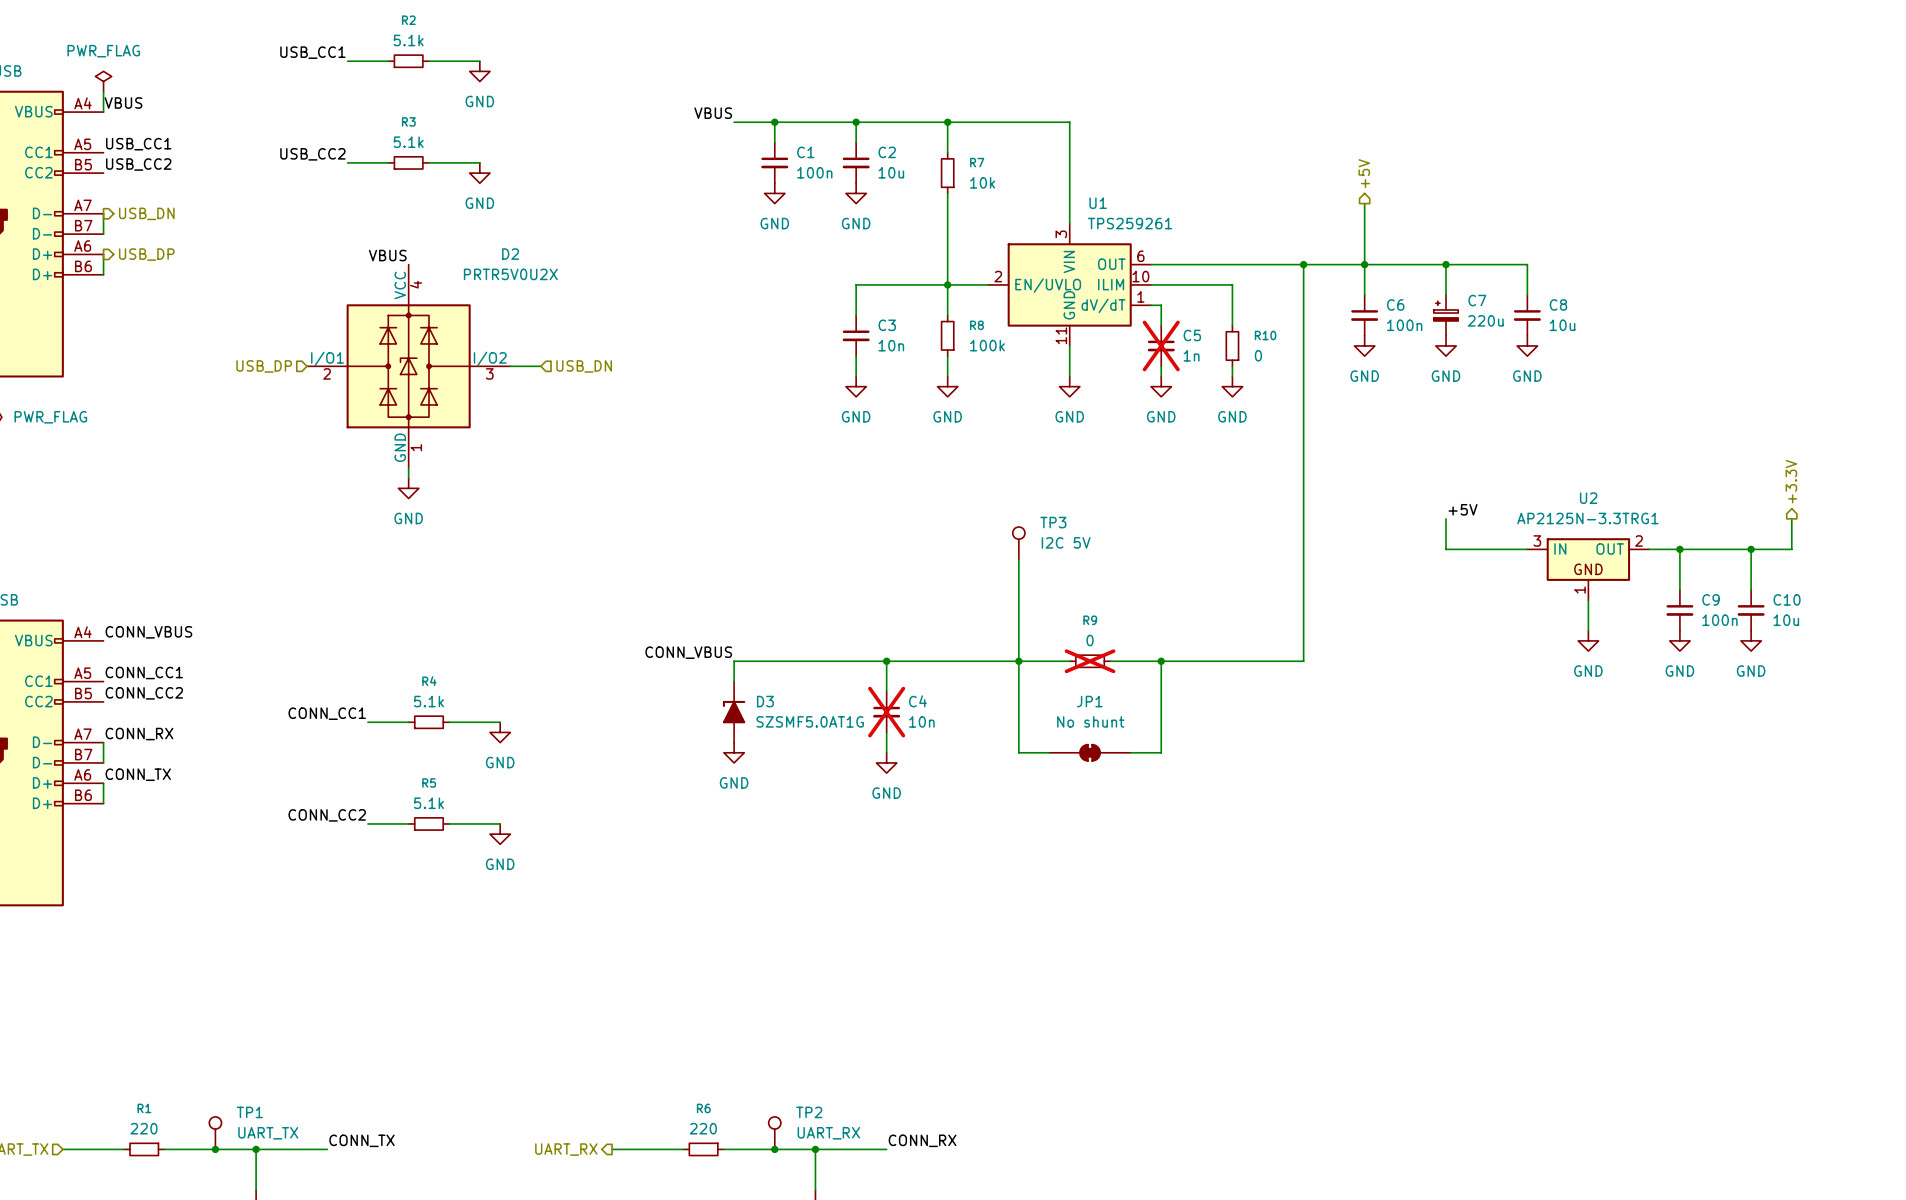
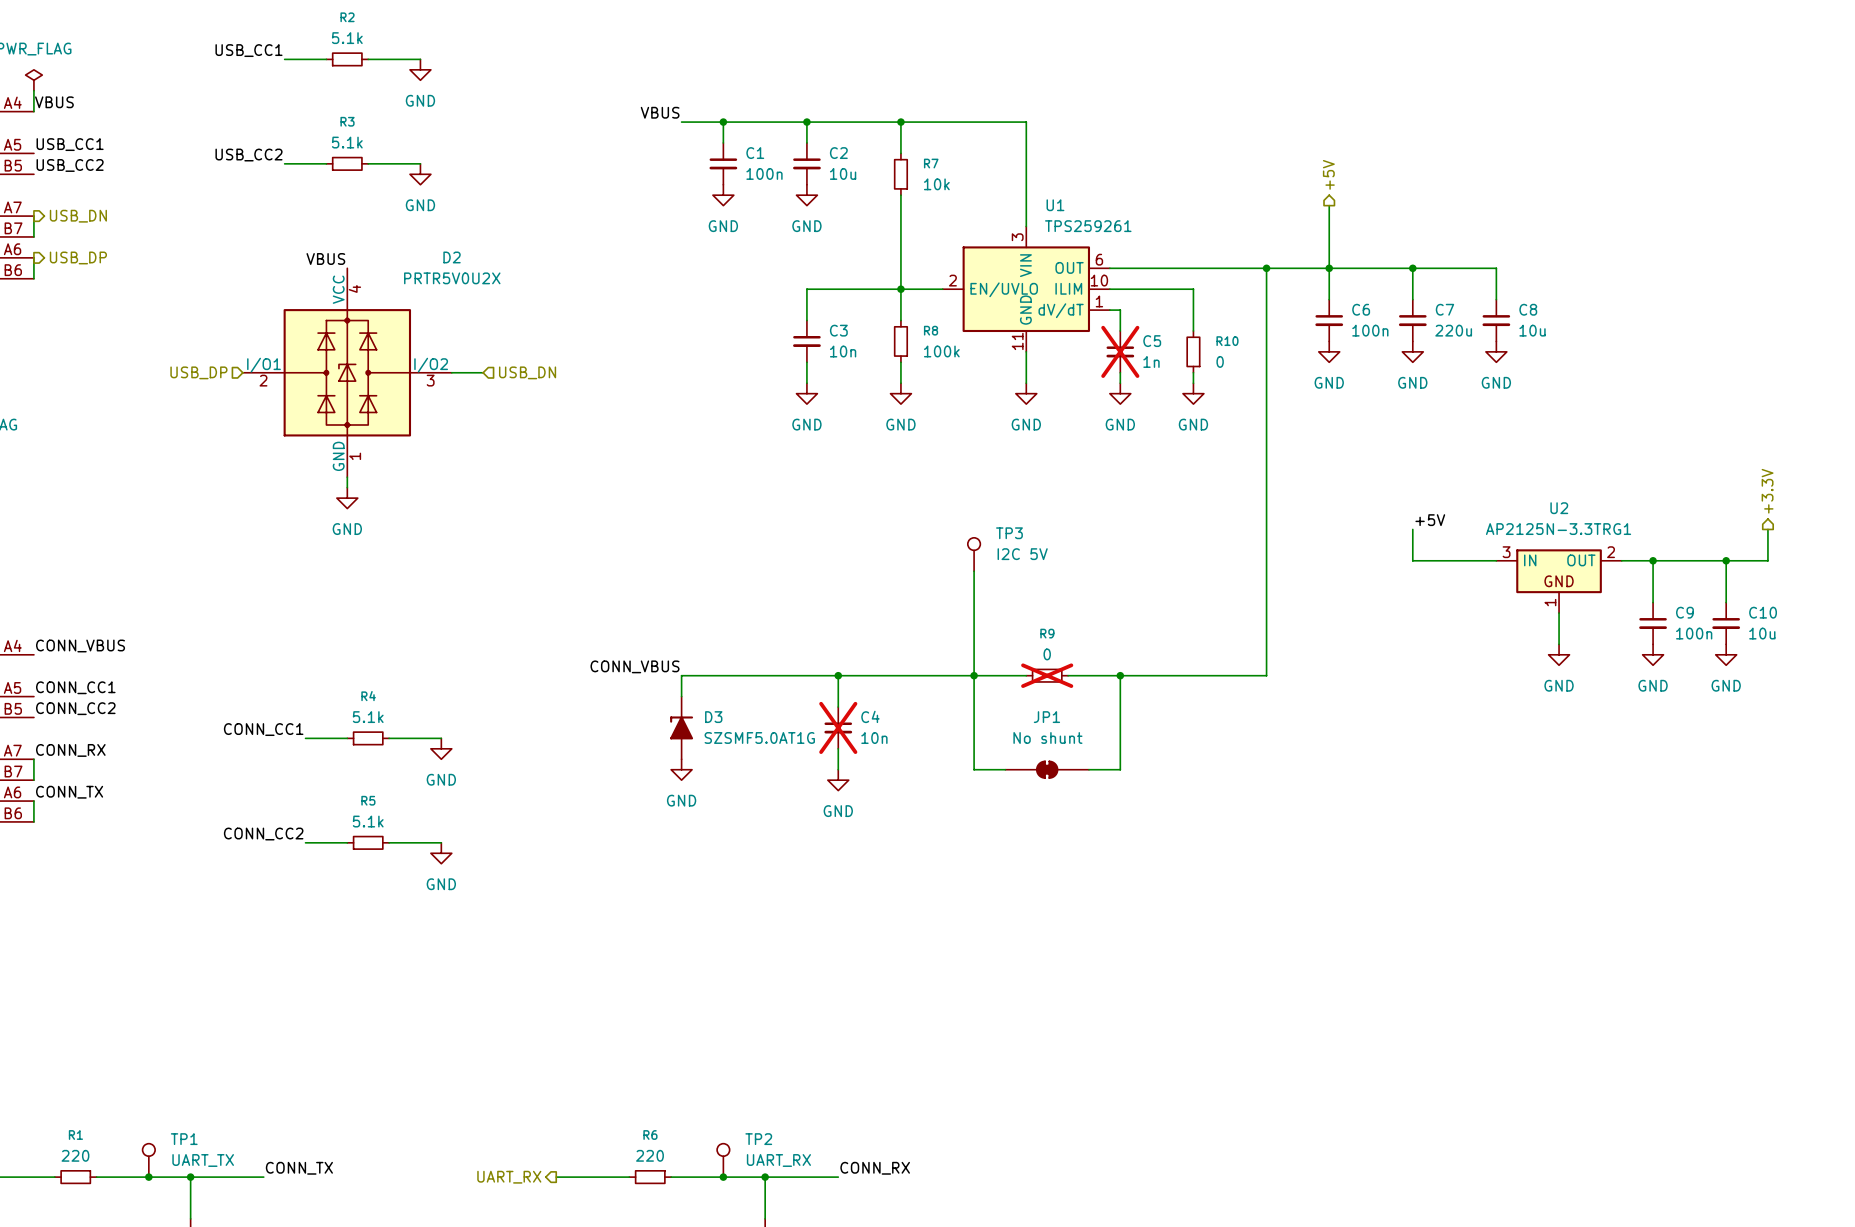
C7 symbol: [1433, 295, 1459, 336] -> [1398, 299, 1427, 342]

